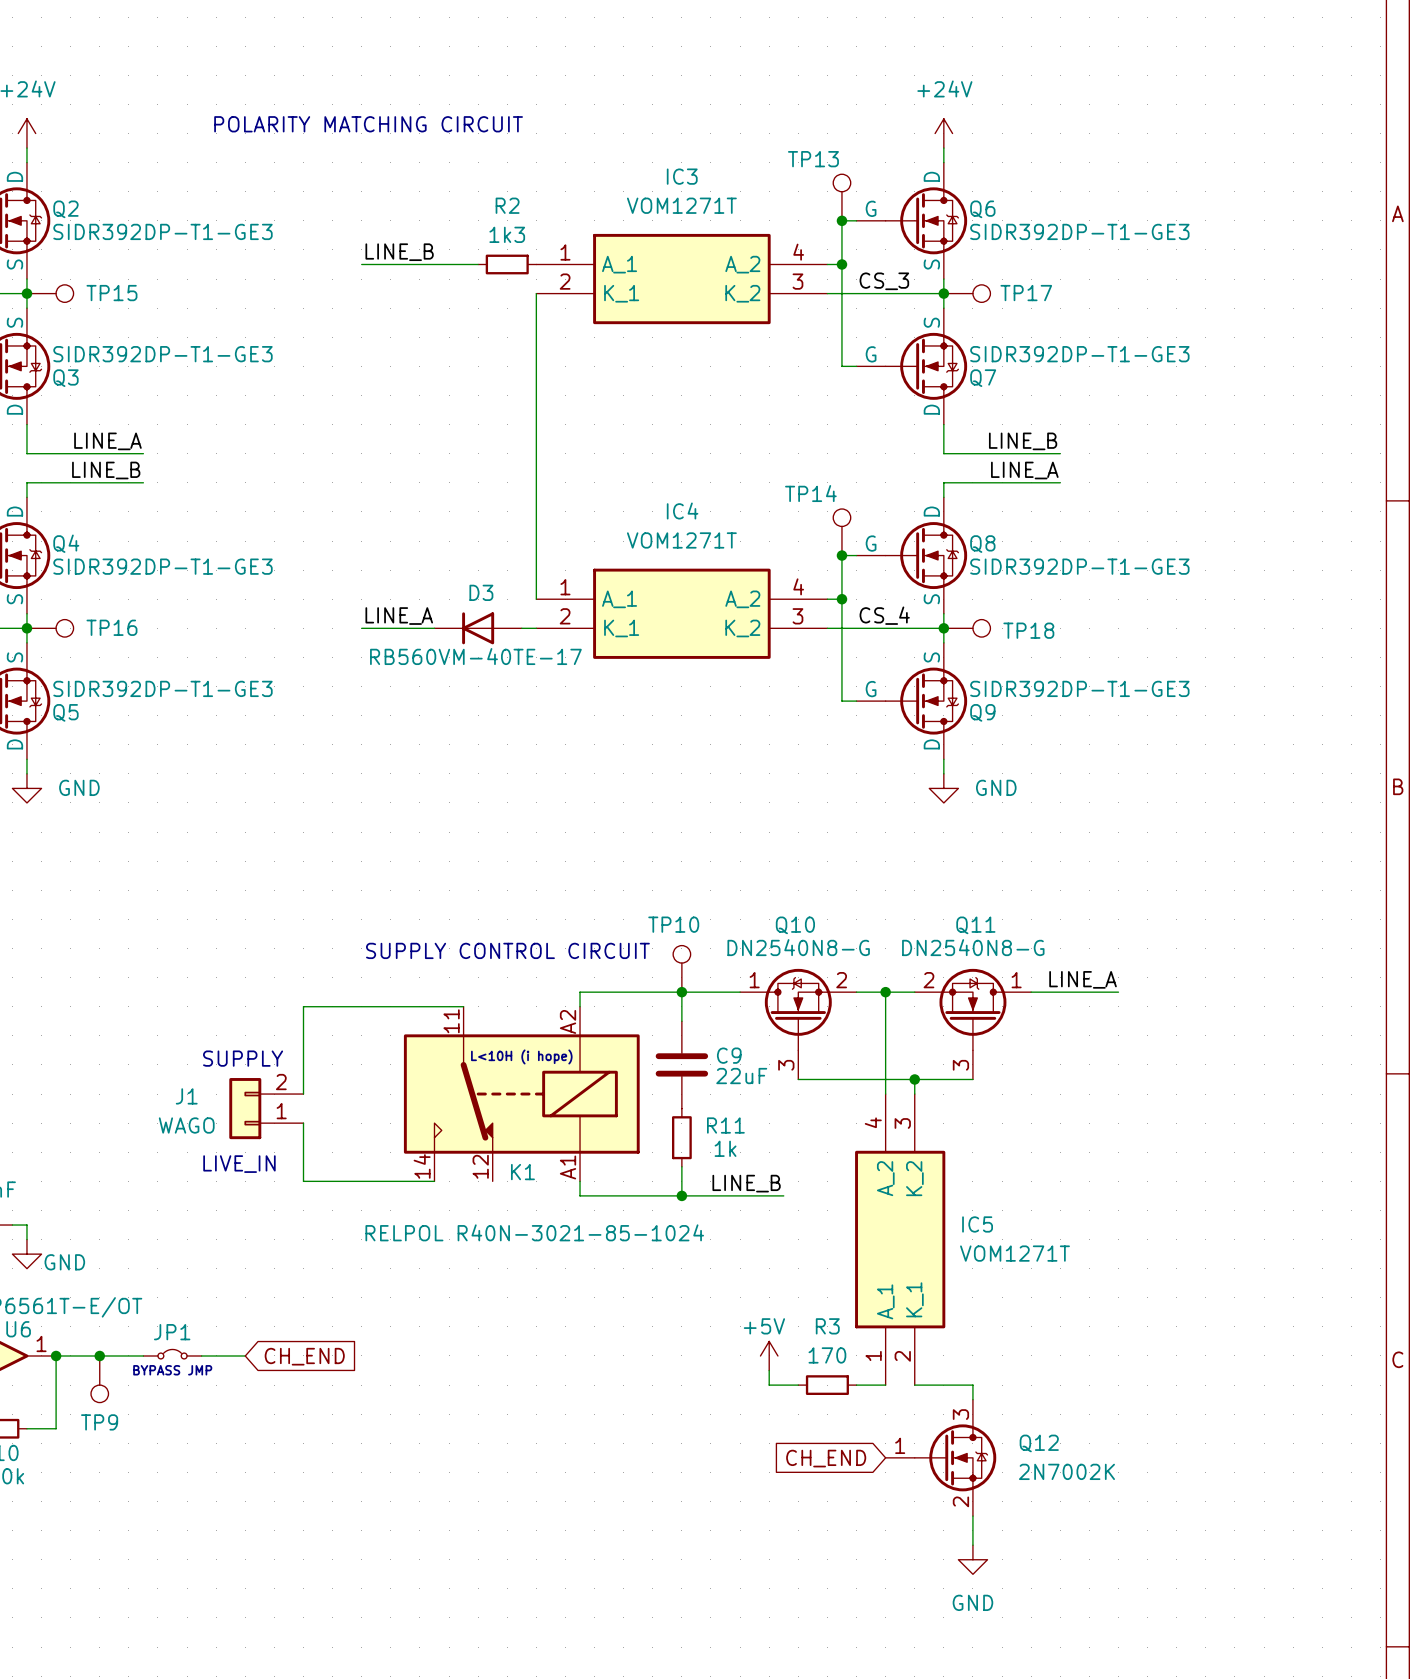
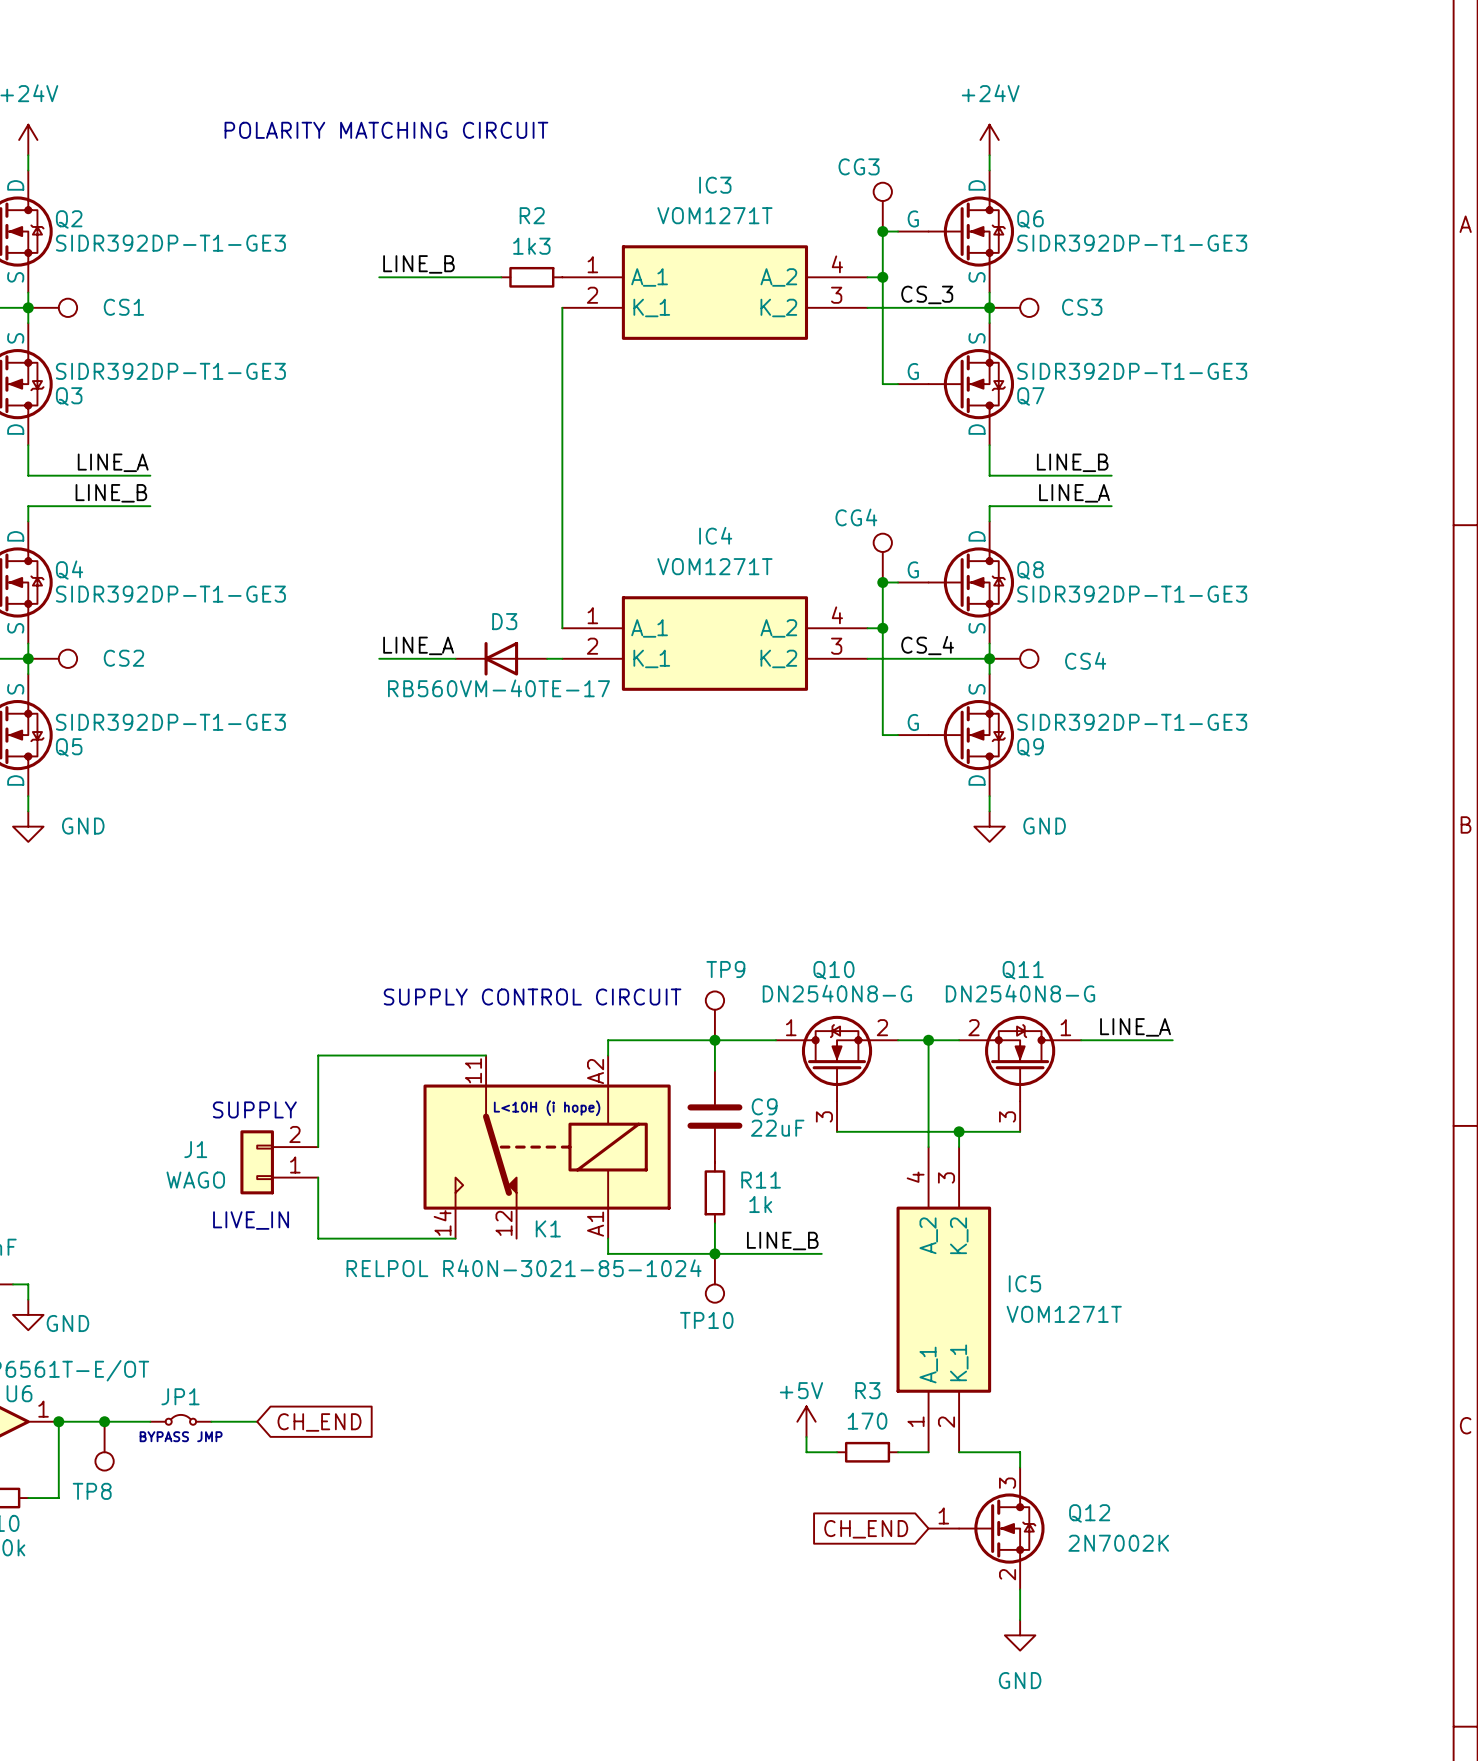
TP13 name: TP13 (813, 159) -> CG3 (859, 166)
TP15 name: TP15 (111, 293) -> CS1 (123, 307)
TP17 name: TP17 (1026, 293) -> CS3 (1082, 307)
TP14 name: TP14 (810, 493) -> CG4 (856, 517)
TP16 name: TP16 (111, 627) -> CS2 (123, 658)
TP18 name: TP18 (1028, 630) -> CS4 (1085, 660)
TP10 name: TP10 (673, 924) -> TP9 (725, 969)
TP10: none -> (714, 1278)
K1 value position: RELPOL R40N-3021-85-1024 (534, 1232) -> RELPOL R40N-3021-85-1024 (524, 1268)
TP9 name: TP9 (99, 1422) -> TP8 (92, 1491)

